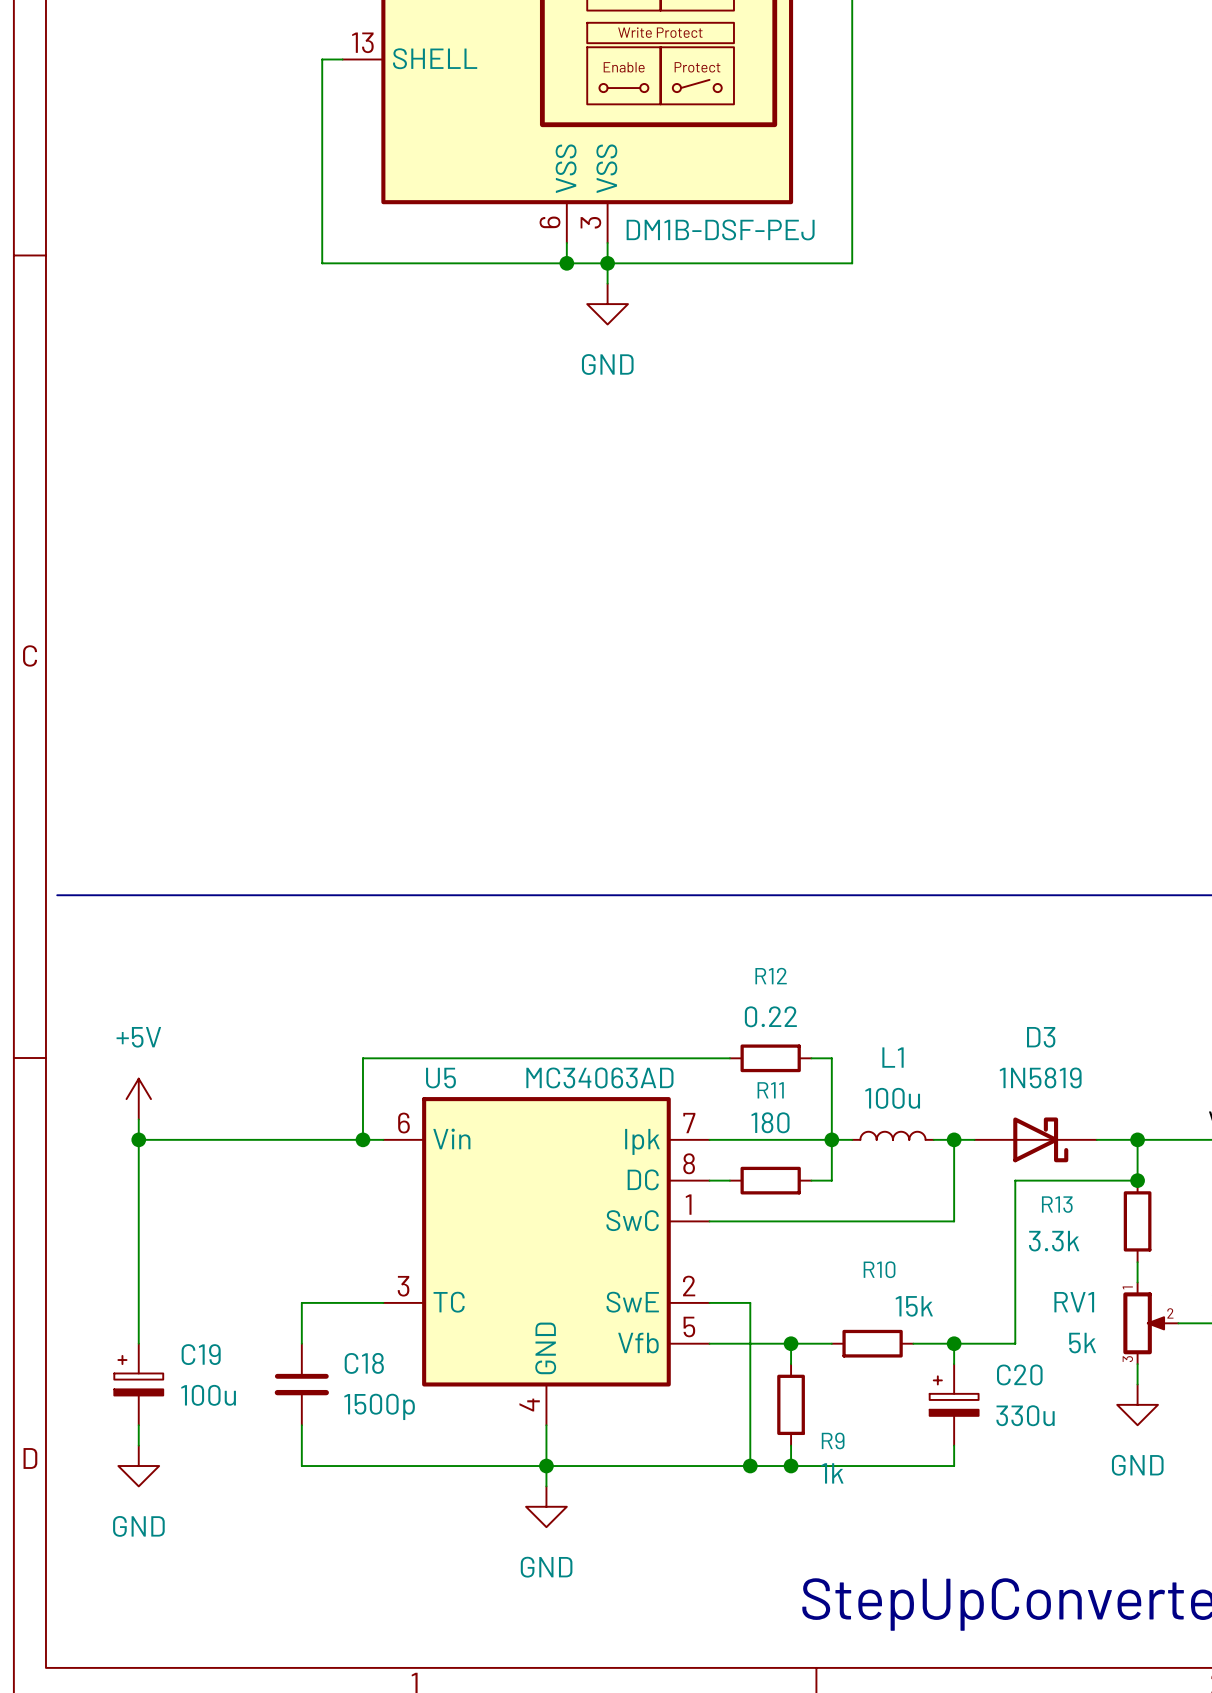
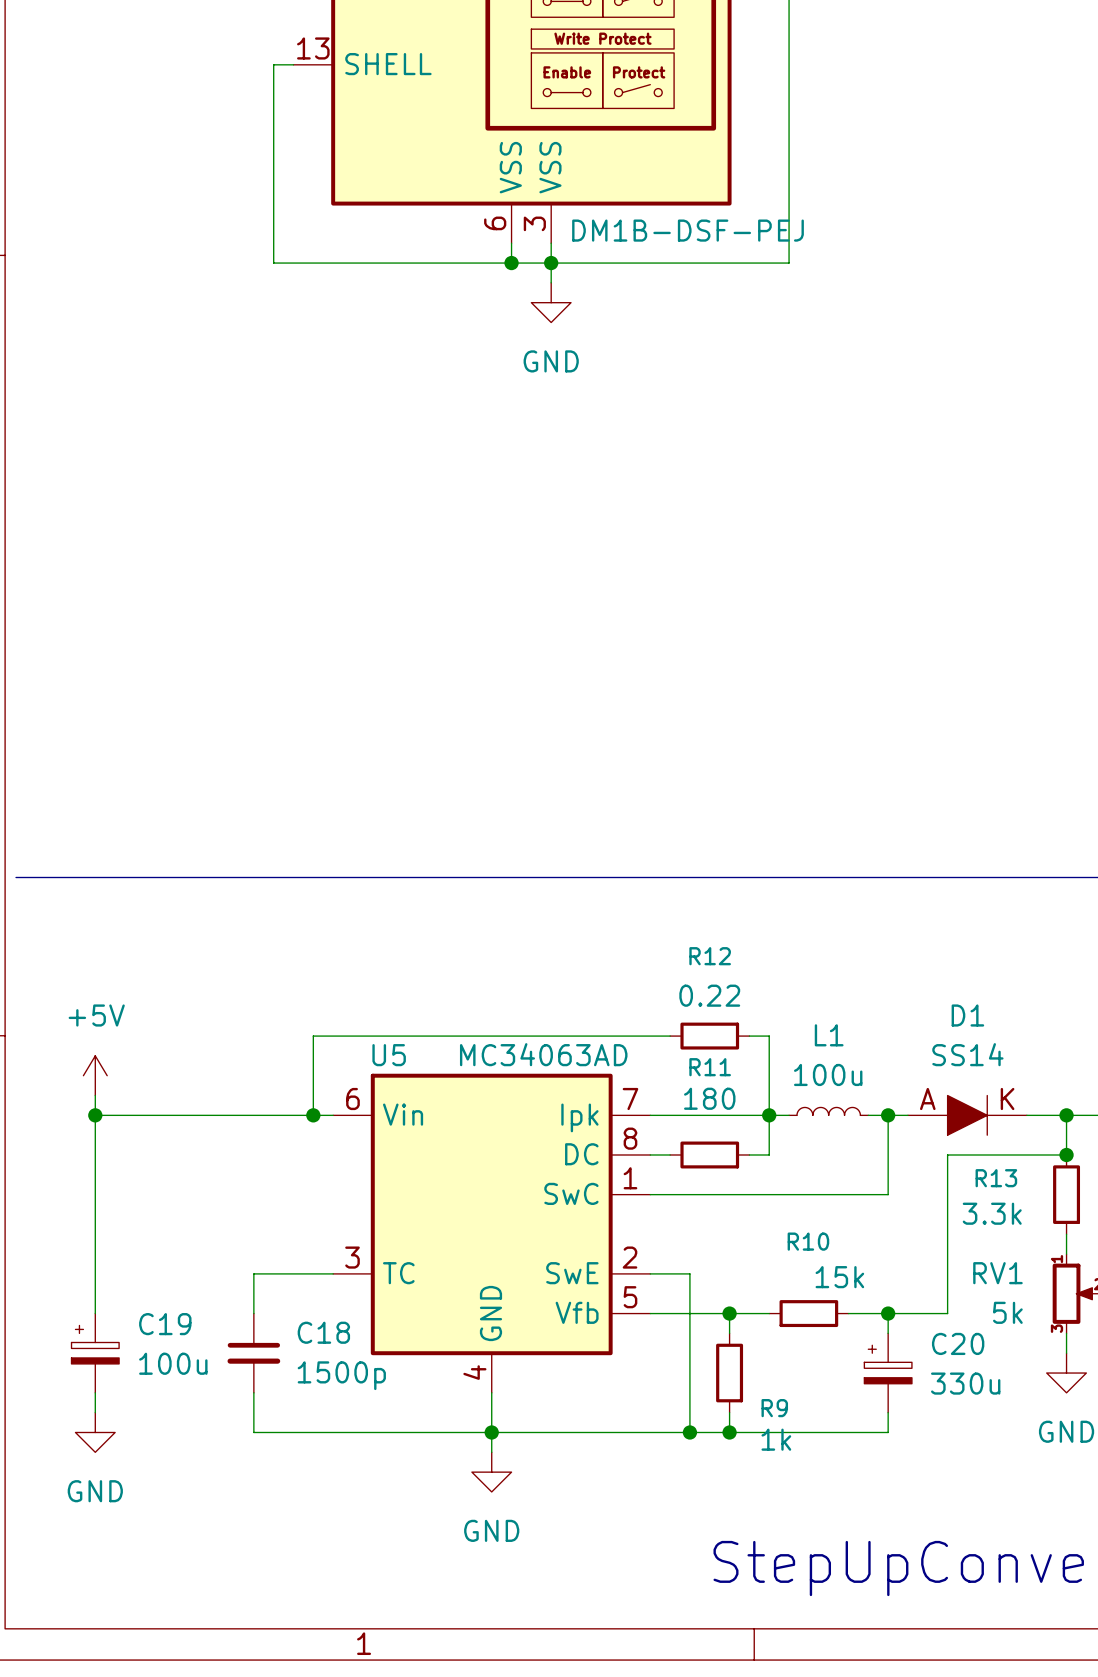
D3: 1N5819 (1035, 1139) -> none
D1: none -> SS14 (967, 1115)

